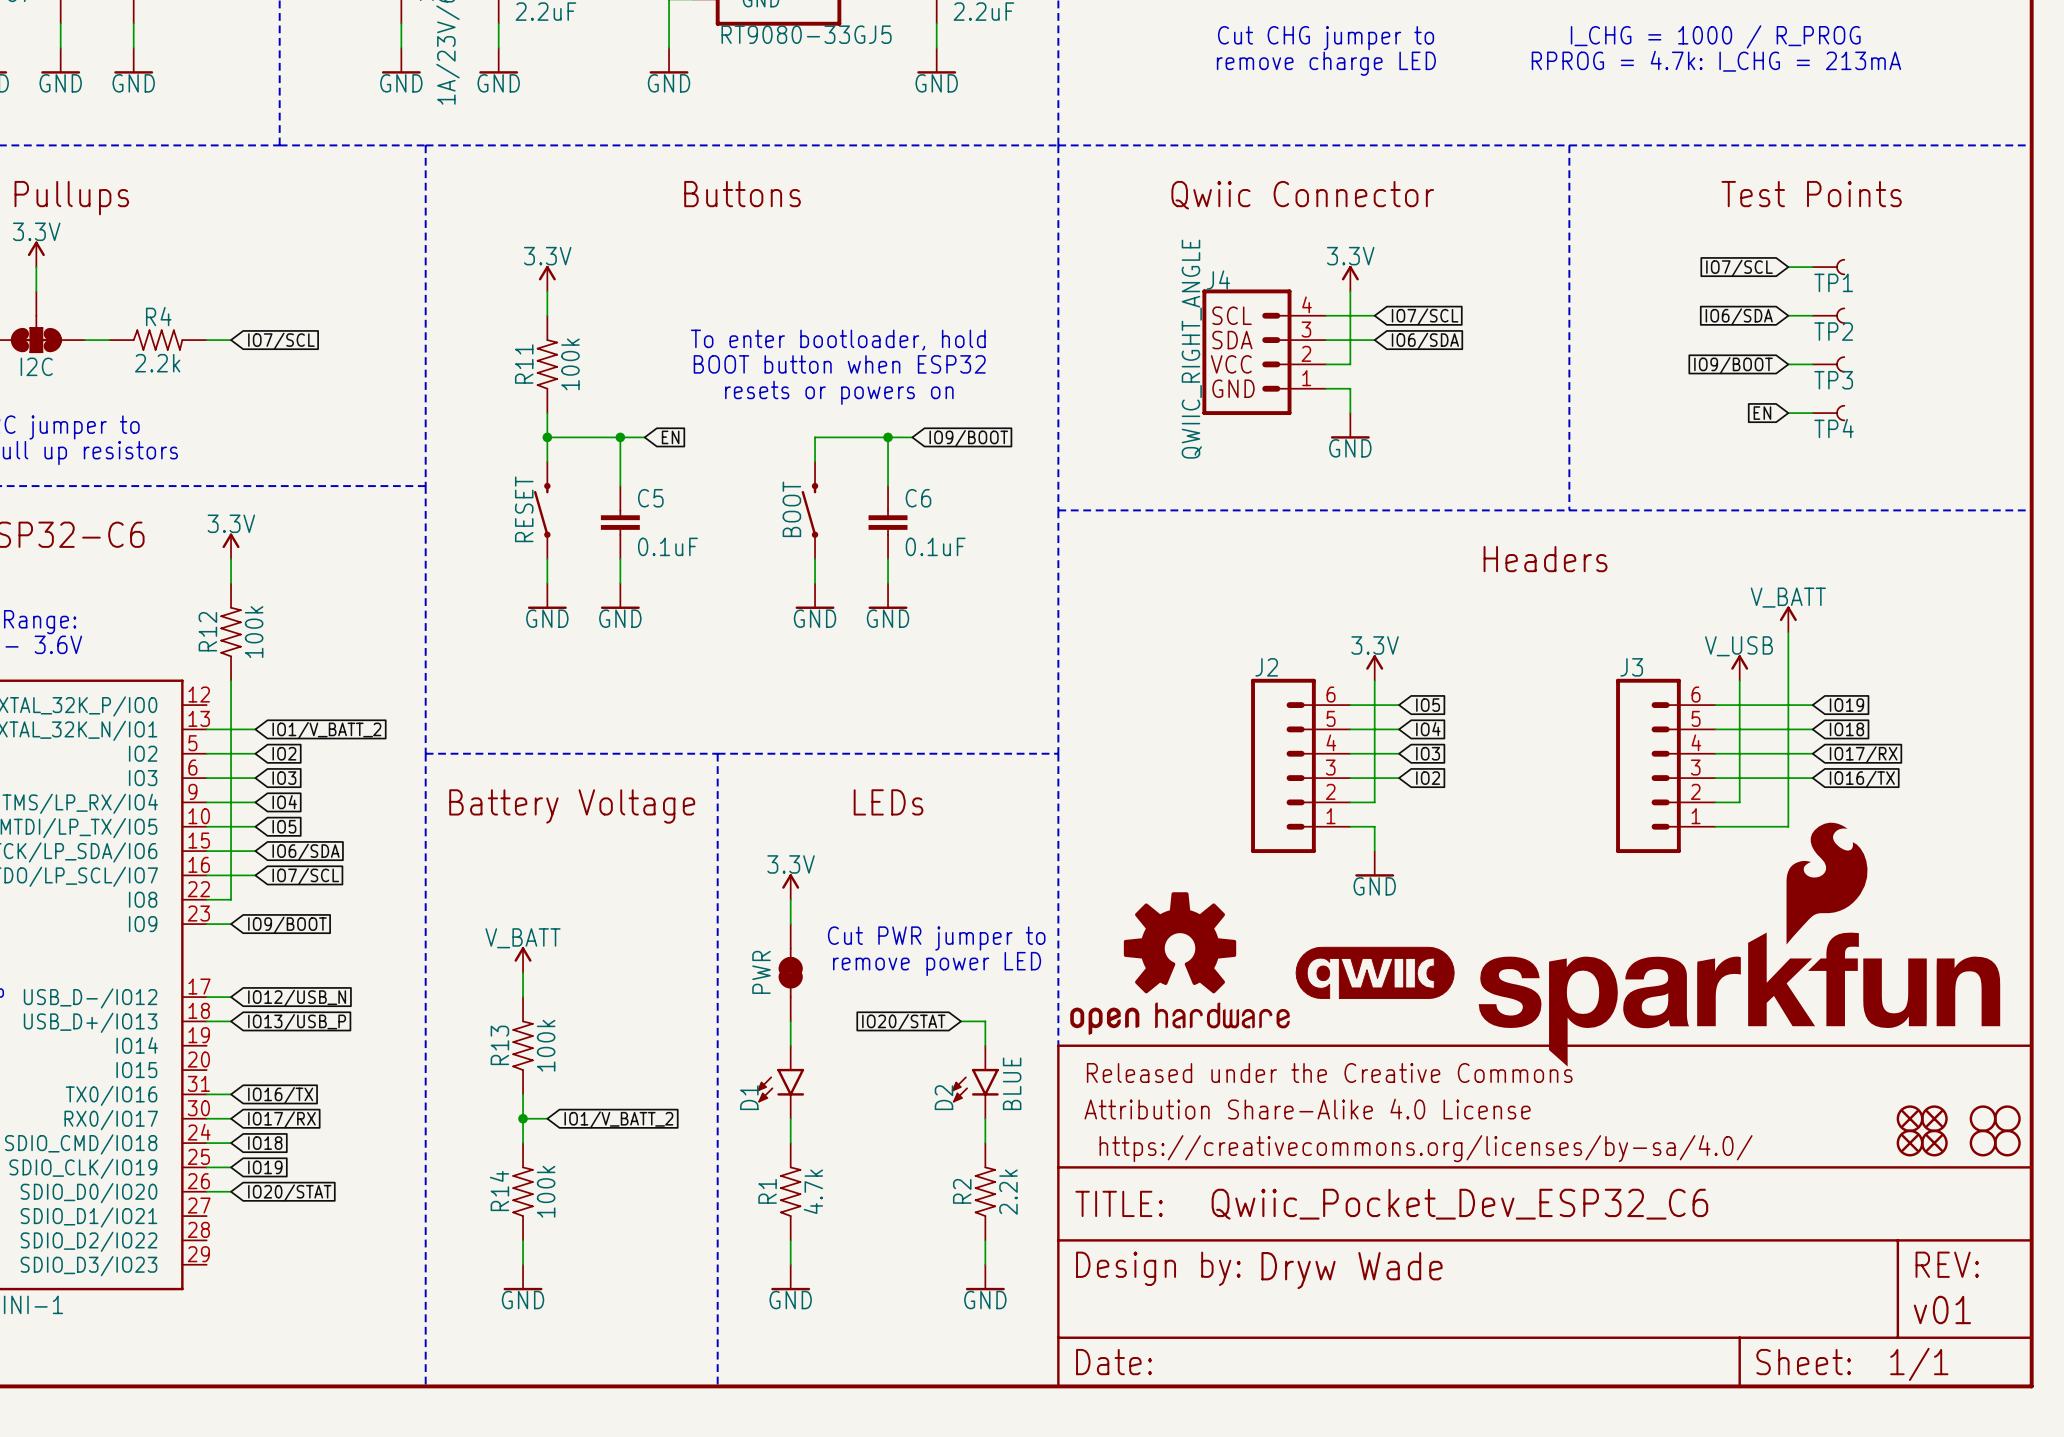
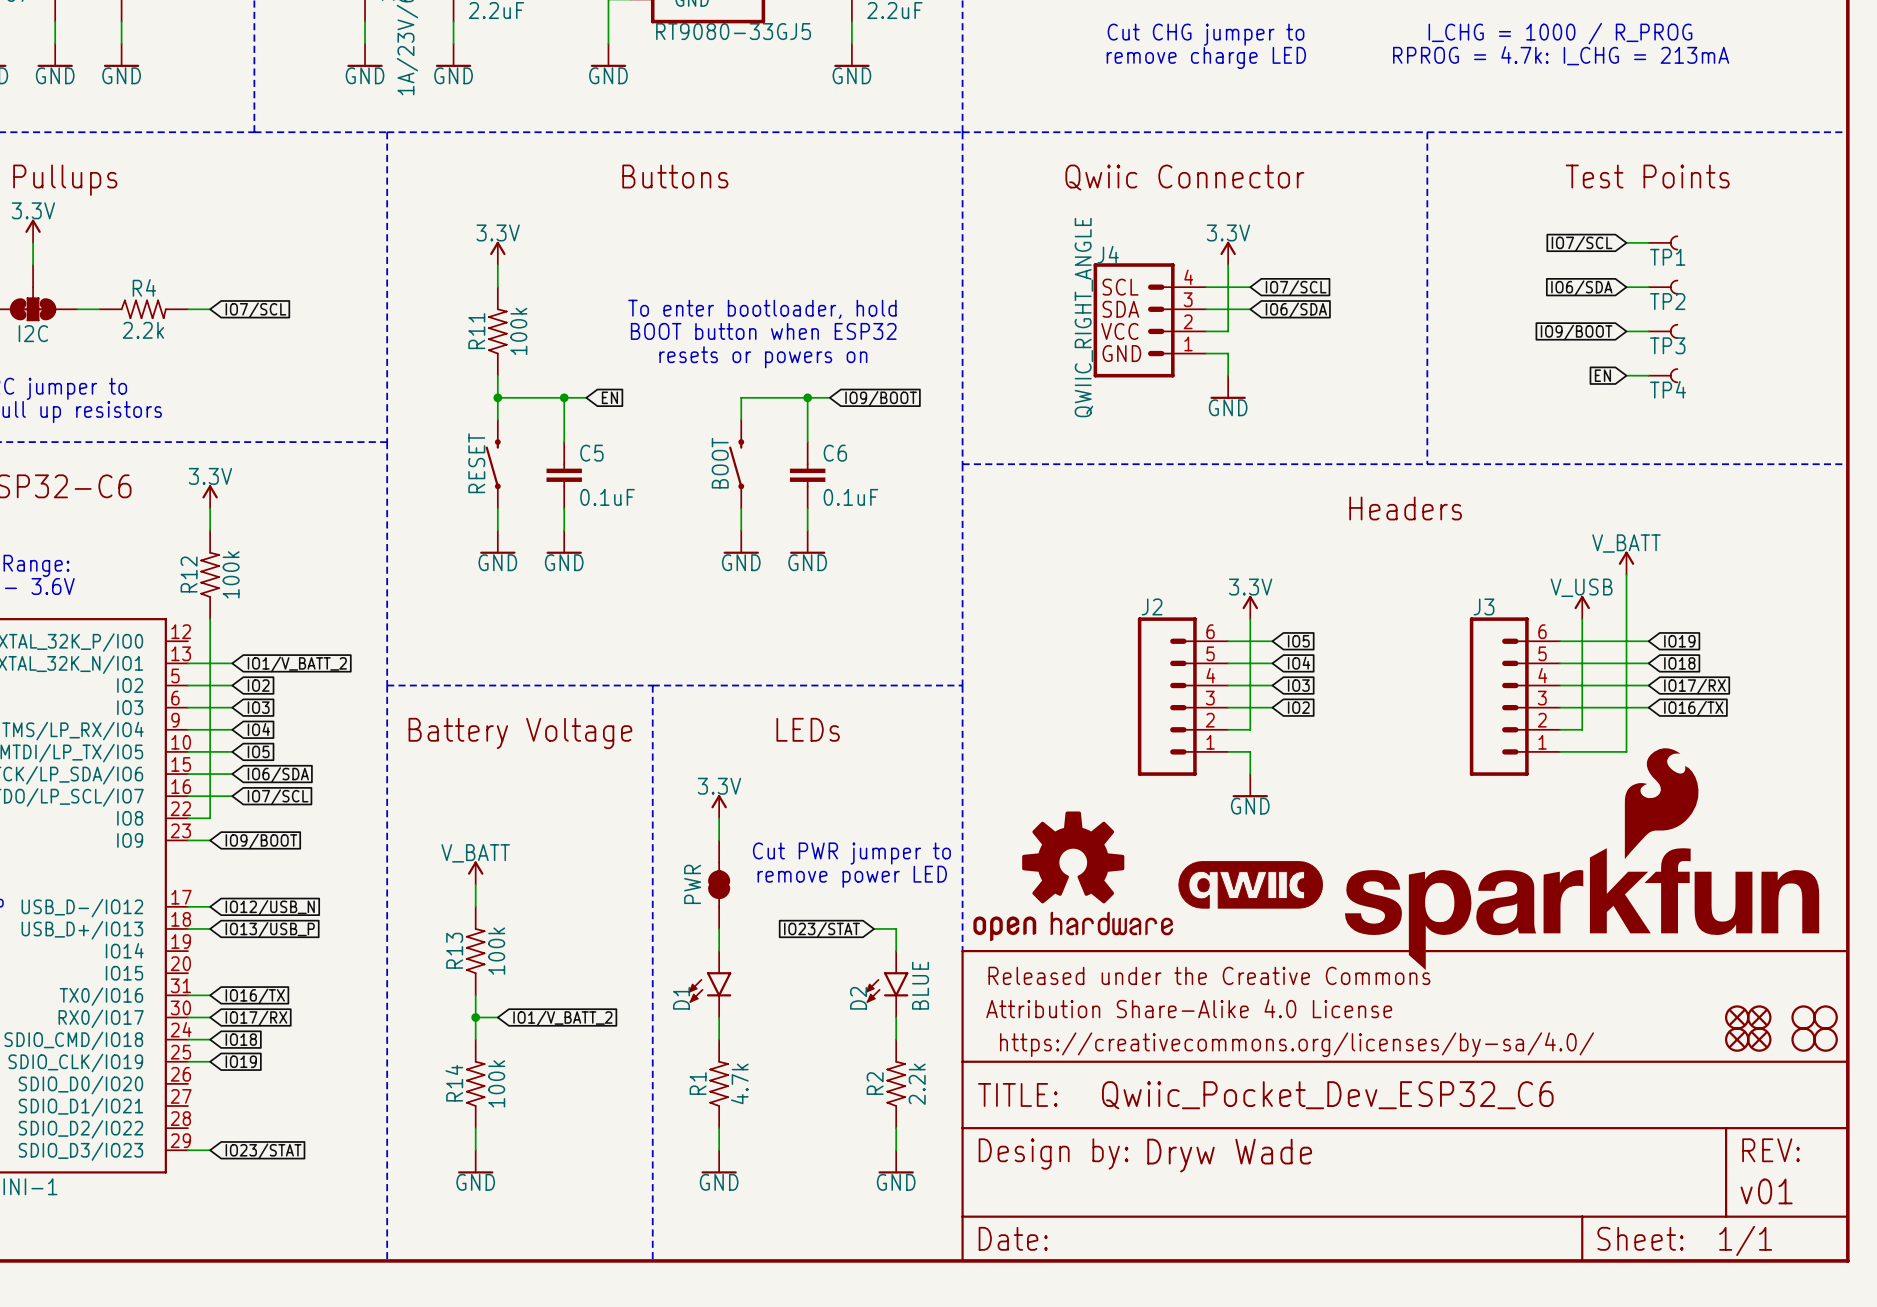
global label: IO20/STAT (903, 1022) -> IO23/STAT (822, 930)
wire: (206, 1191) (231, 1191) -> (187, 1150) (210, 1150)
global label: IO20/STAT (289, 1192) -> none
global label: none -> IO23/STAT (263, 1151)

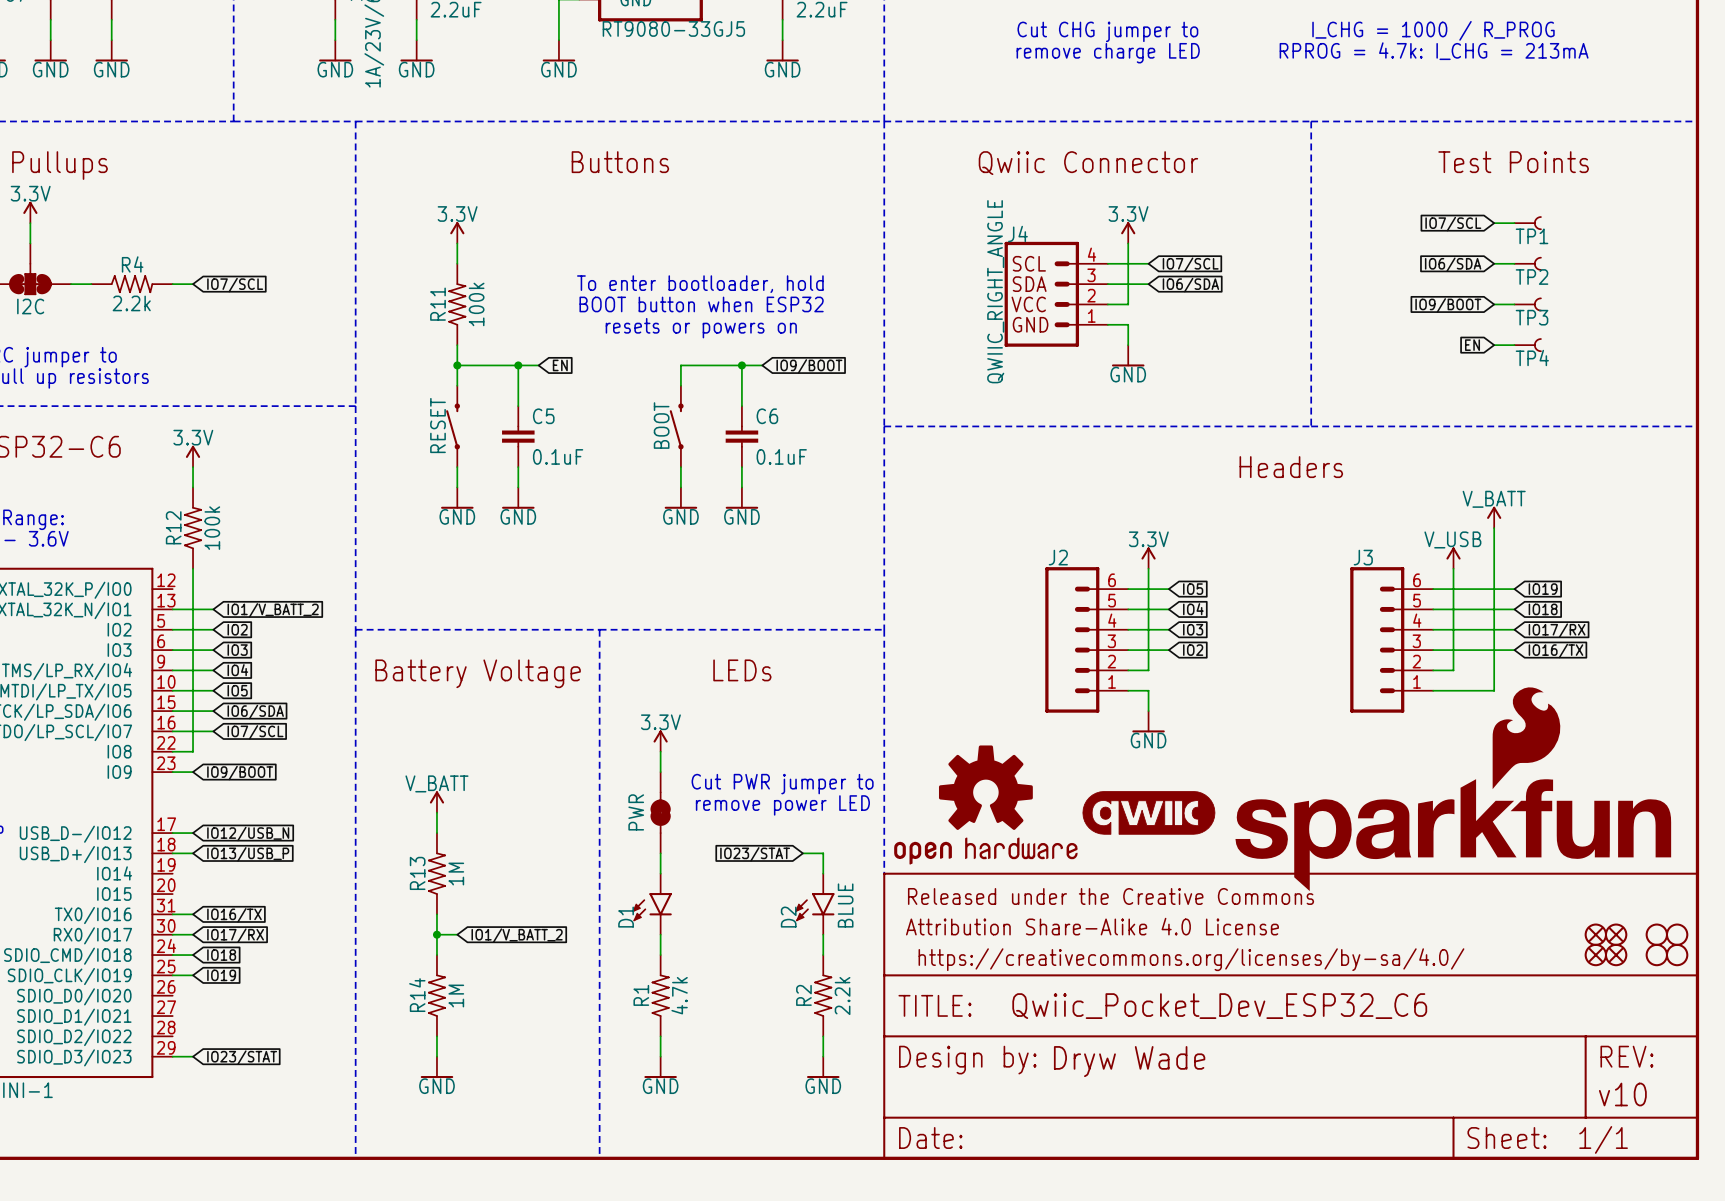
R13 value: 100k (496, 951) -> 1M (456, 874)
R14 value: 100k (496, 1083) -> 1M (456, 996)
part text: v01 (1766, 1191) -> v10 (1622, 1094)

